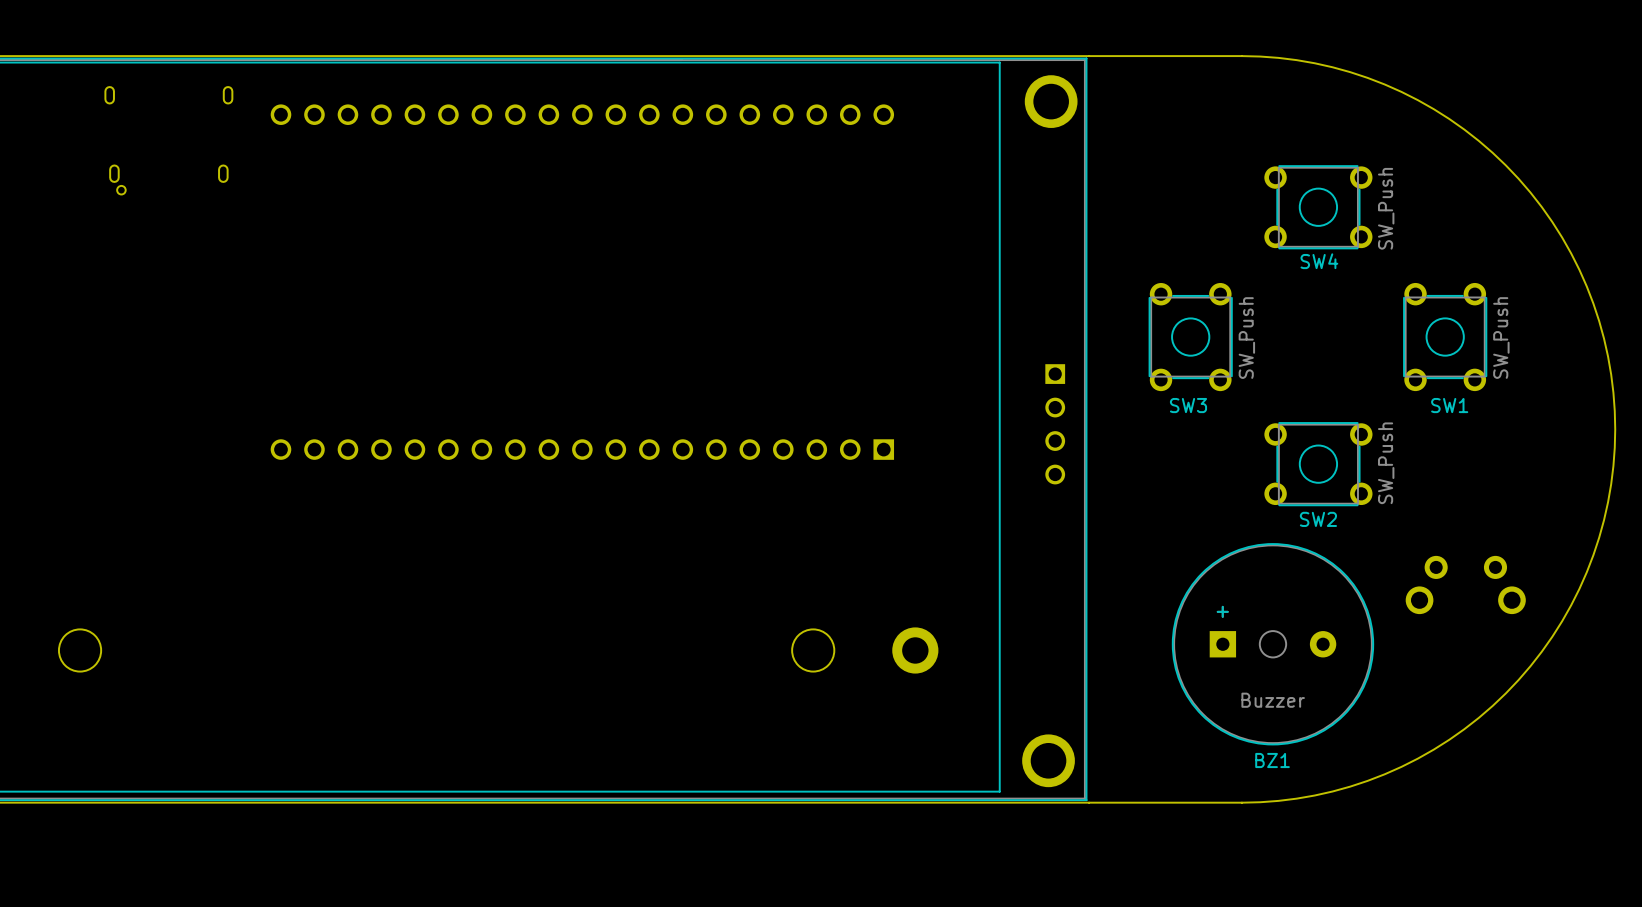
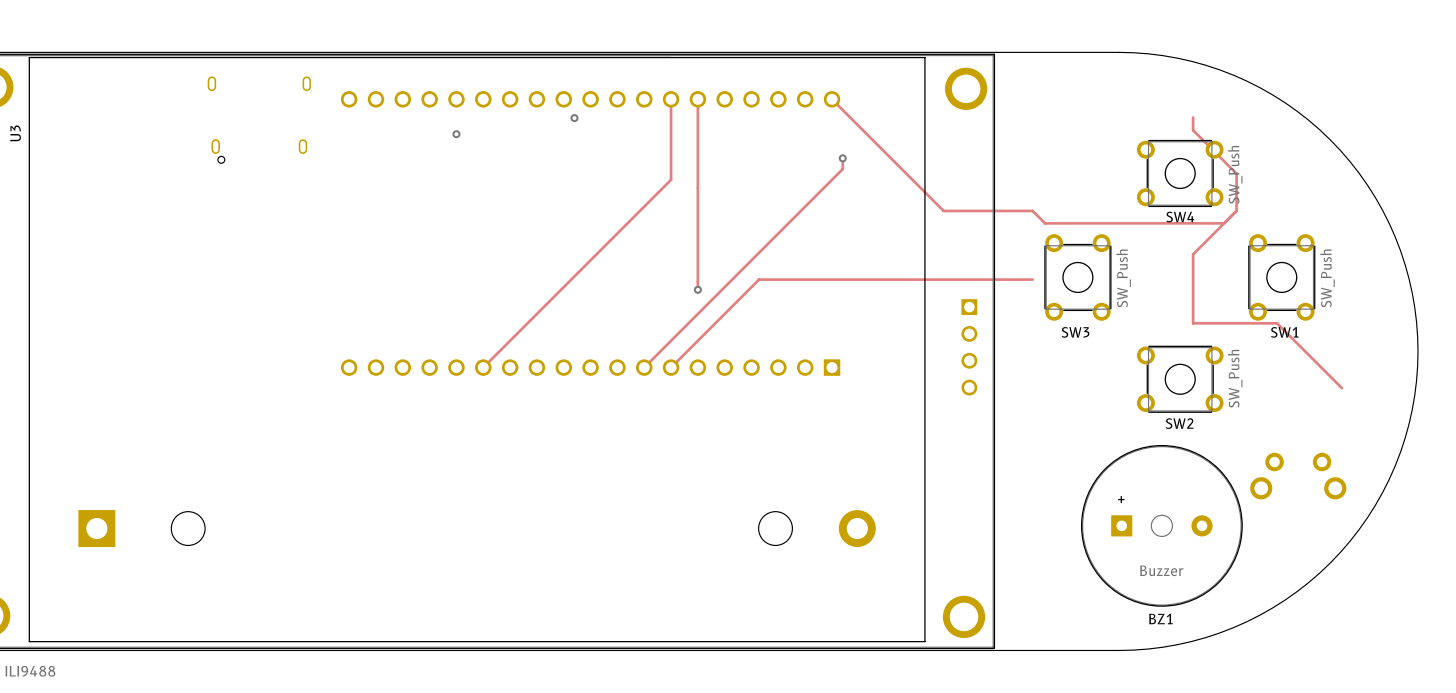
track: none -> (671, 99) (671, 179) (483, 367)
track: none -> (697, 99) (697, 289)
track: none -> (832, 99) (943, 210) (1032, 210) (1045, 223) (1224, 223)
track: none -> (1193, 117) (1193, 130) (1236, 173) (1236, 210) (1193, 254) (1193, 323) (1277, 323) (1341, 388)
via: none -> (574, 118)
via: none -> (456, 134)
track: none -> (842, 158) (842, 169) (644, 367)
via: none -> (842, 158)
track: none -> (1032, 279) (759, 279) (671, 367)
via: none -> (697, 289)
BZ1 position: (1272, 644) -> (1161, 525)

